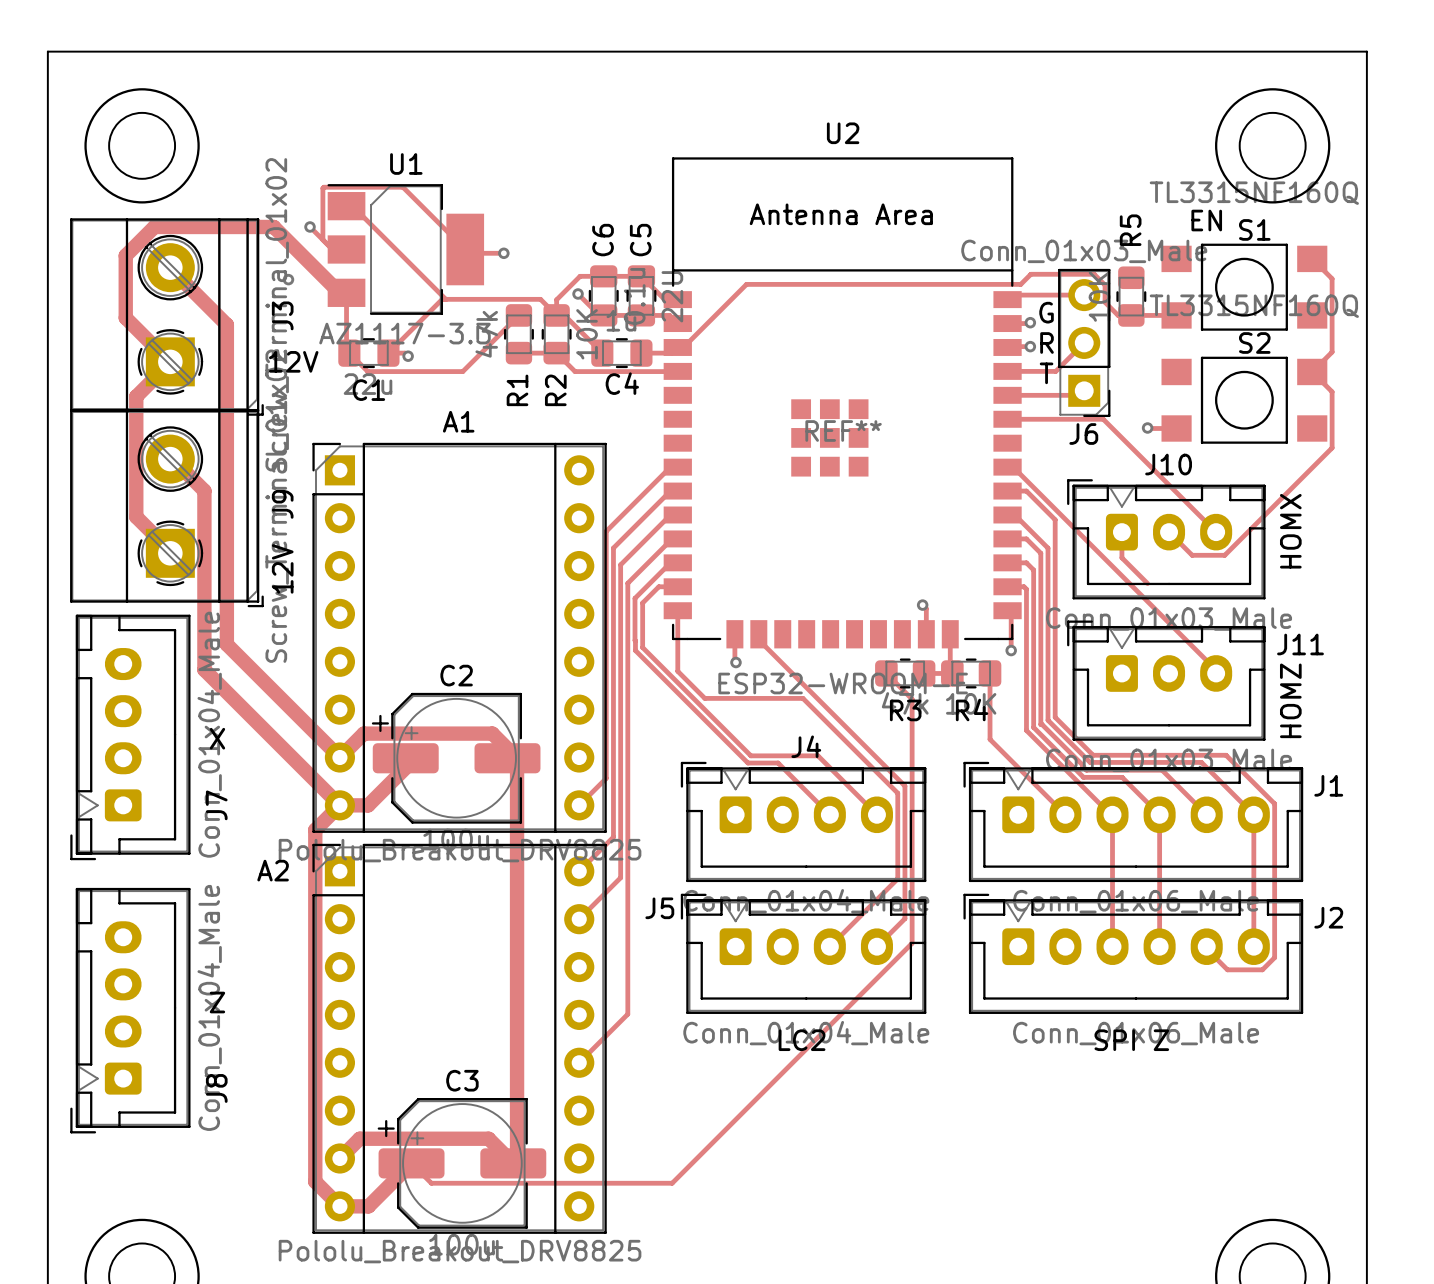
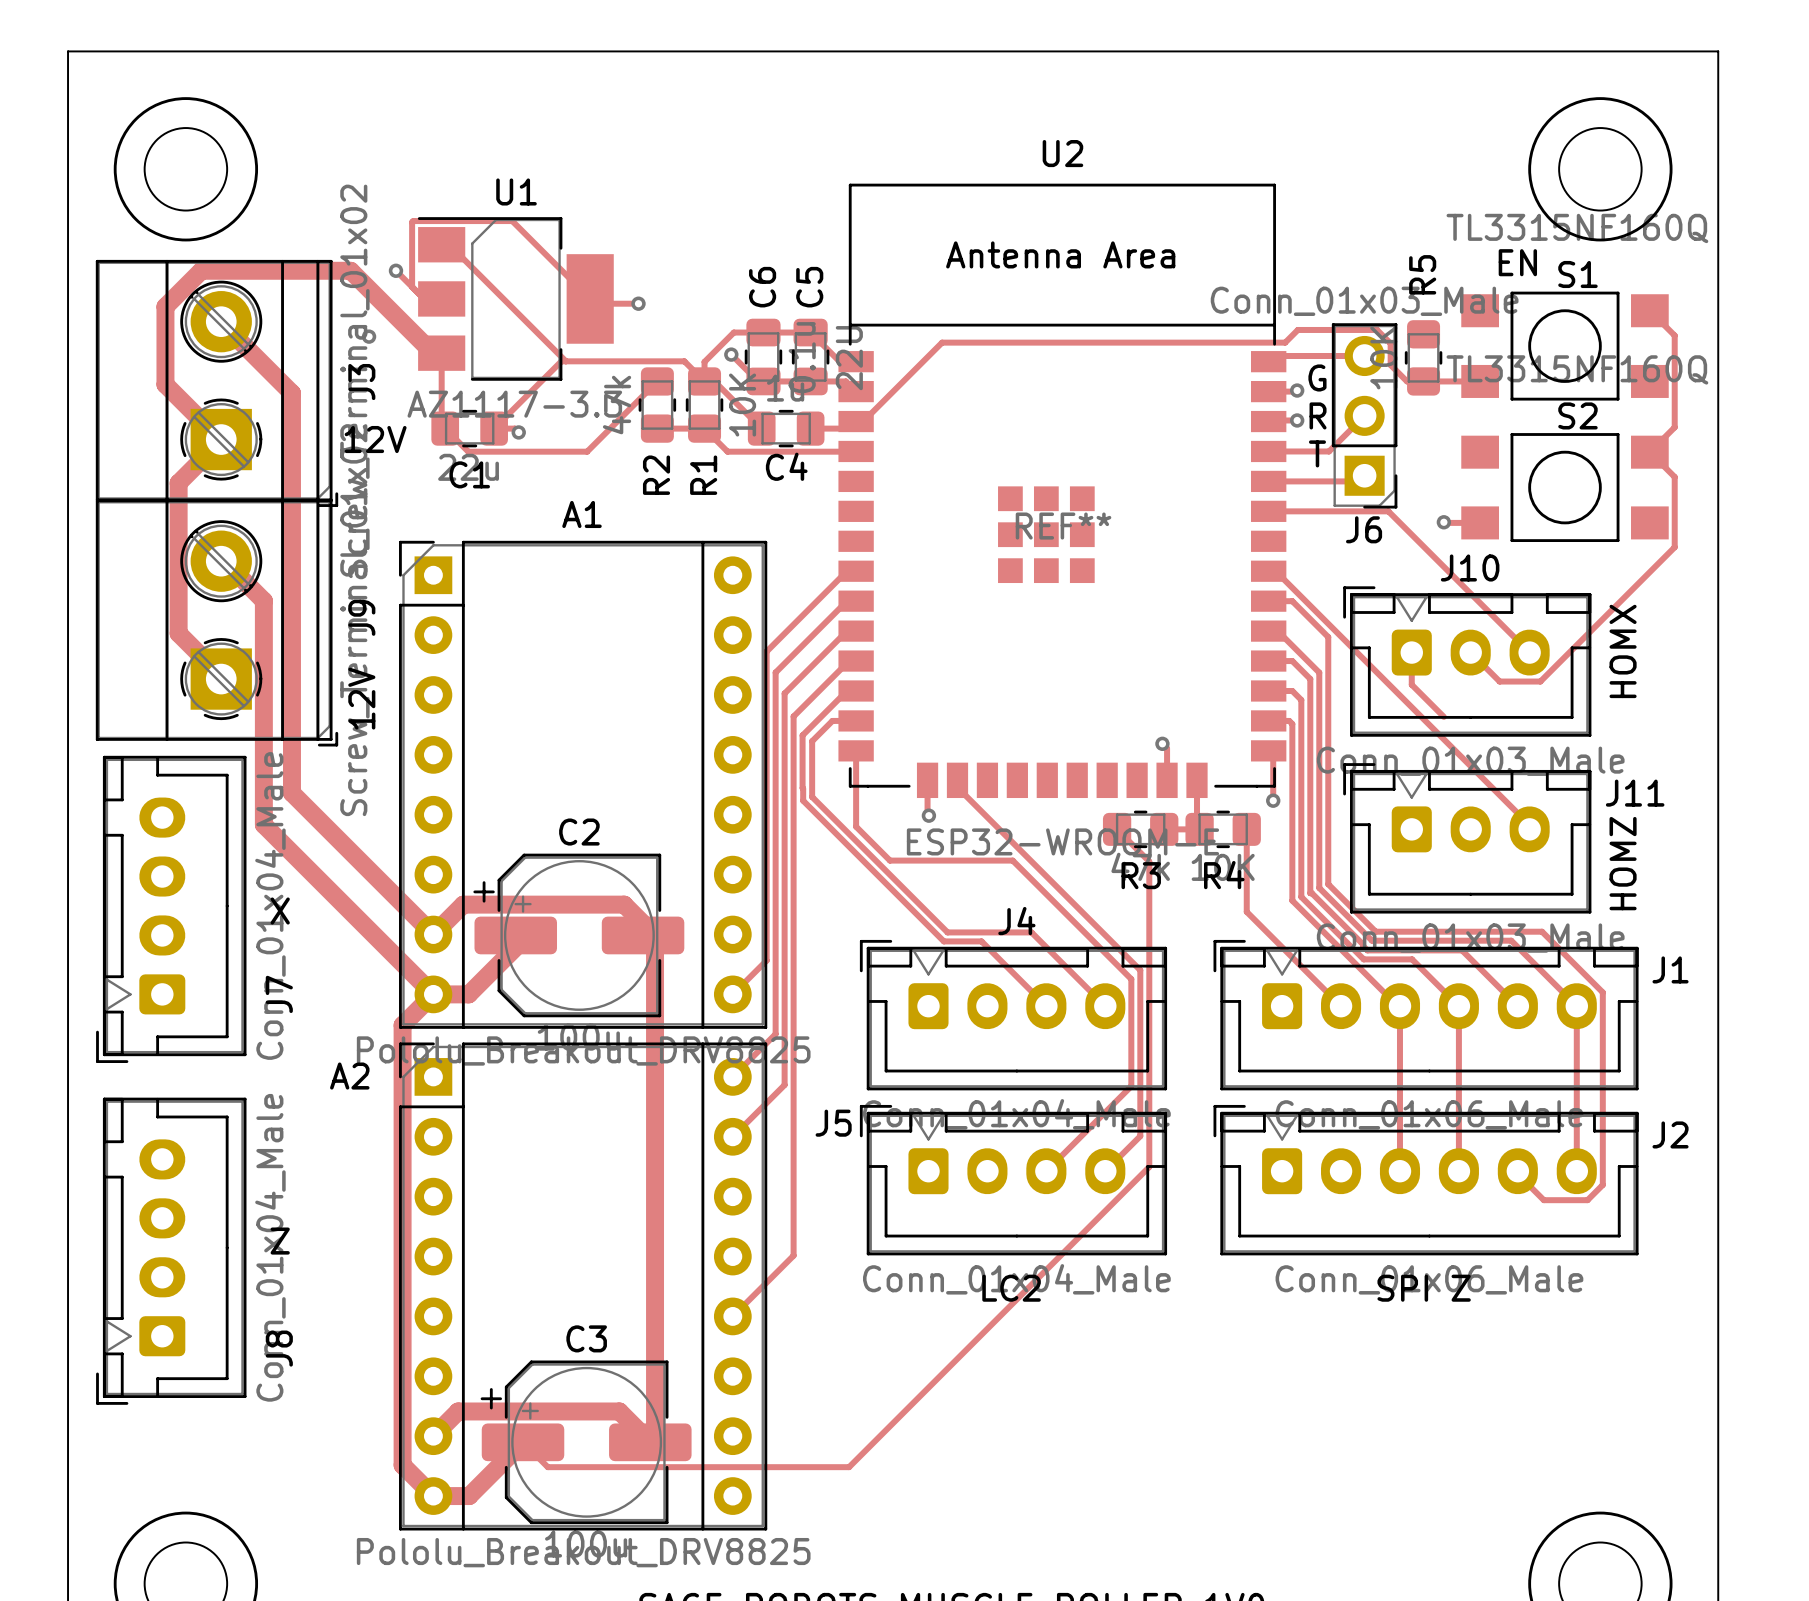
R1 name position: R1 (517, 390) -> R1 (703, 475)
R2 name position: R2 (555, 390) -> R2 (656, 475)

